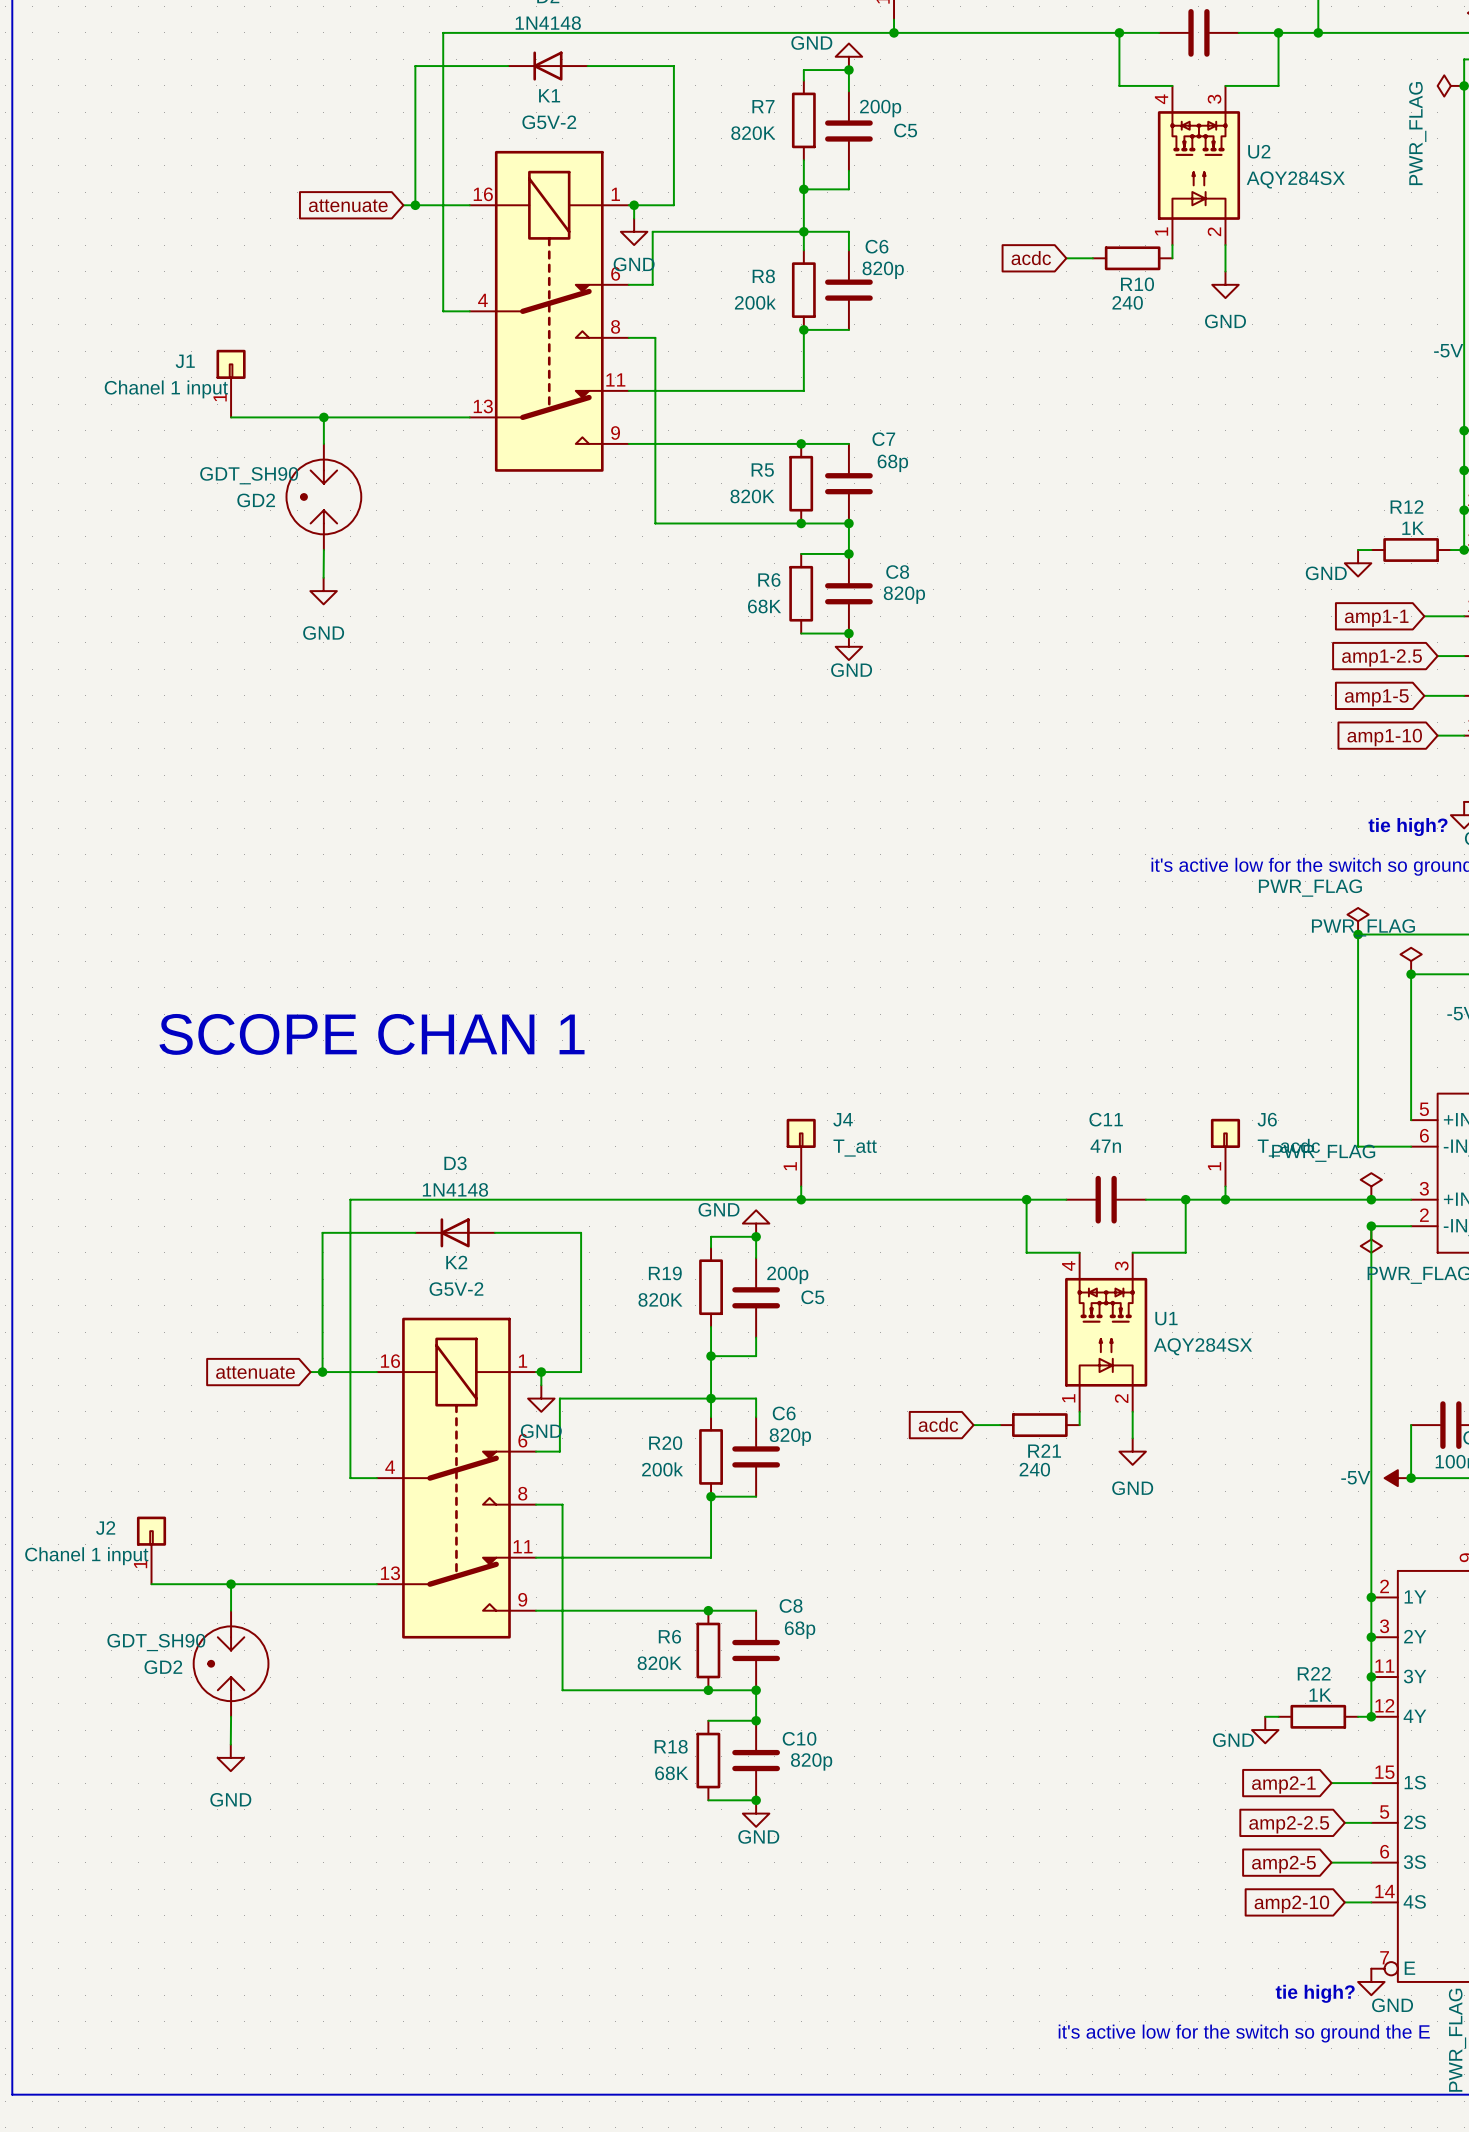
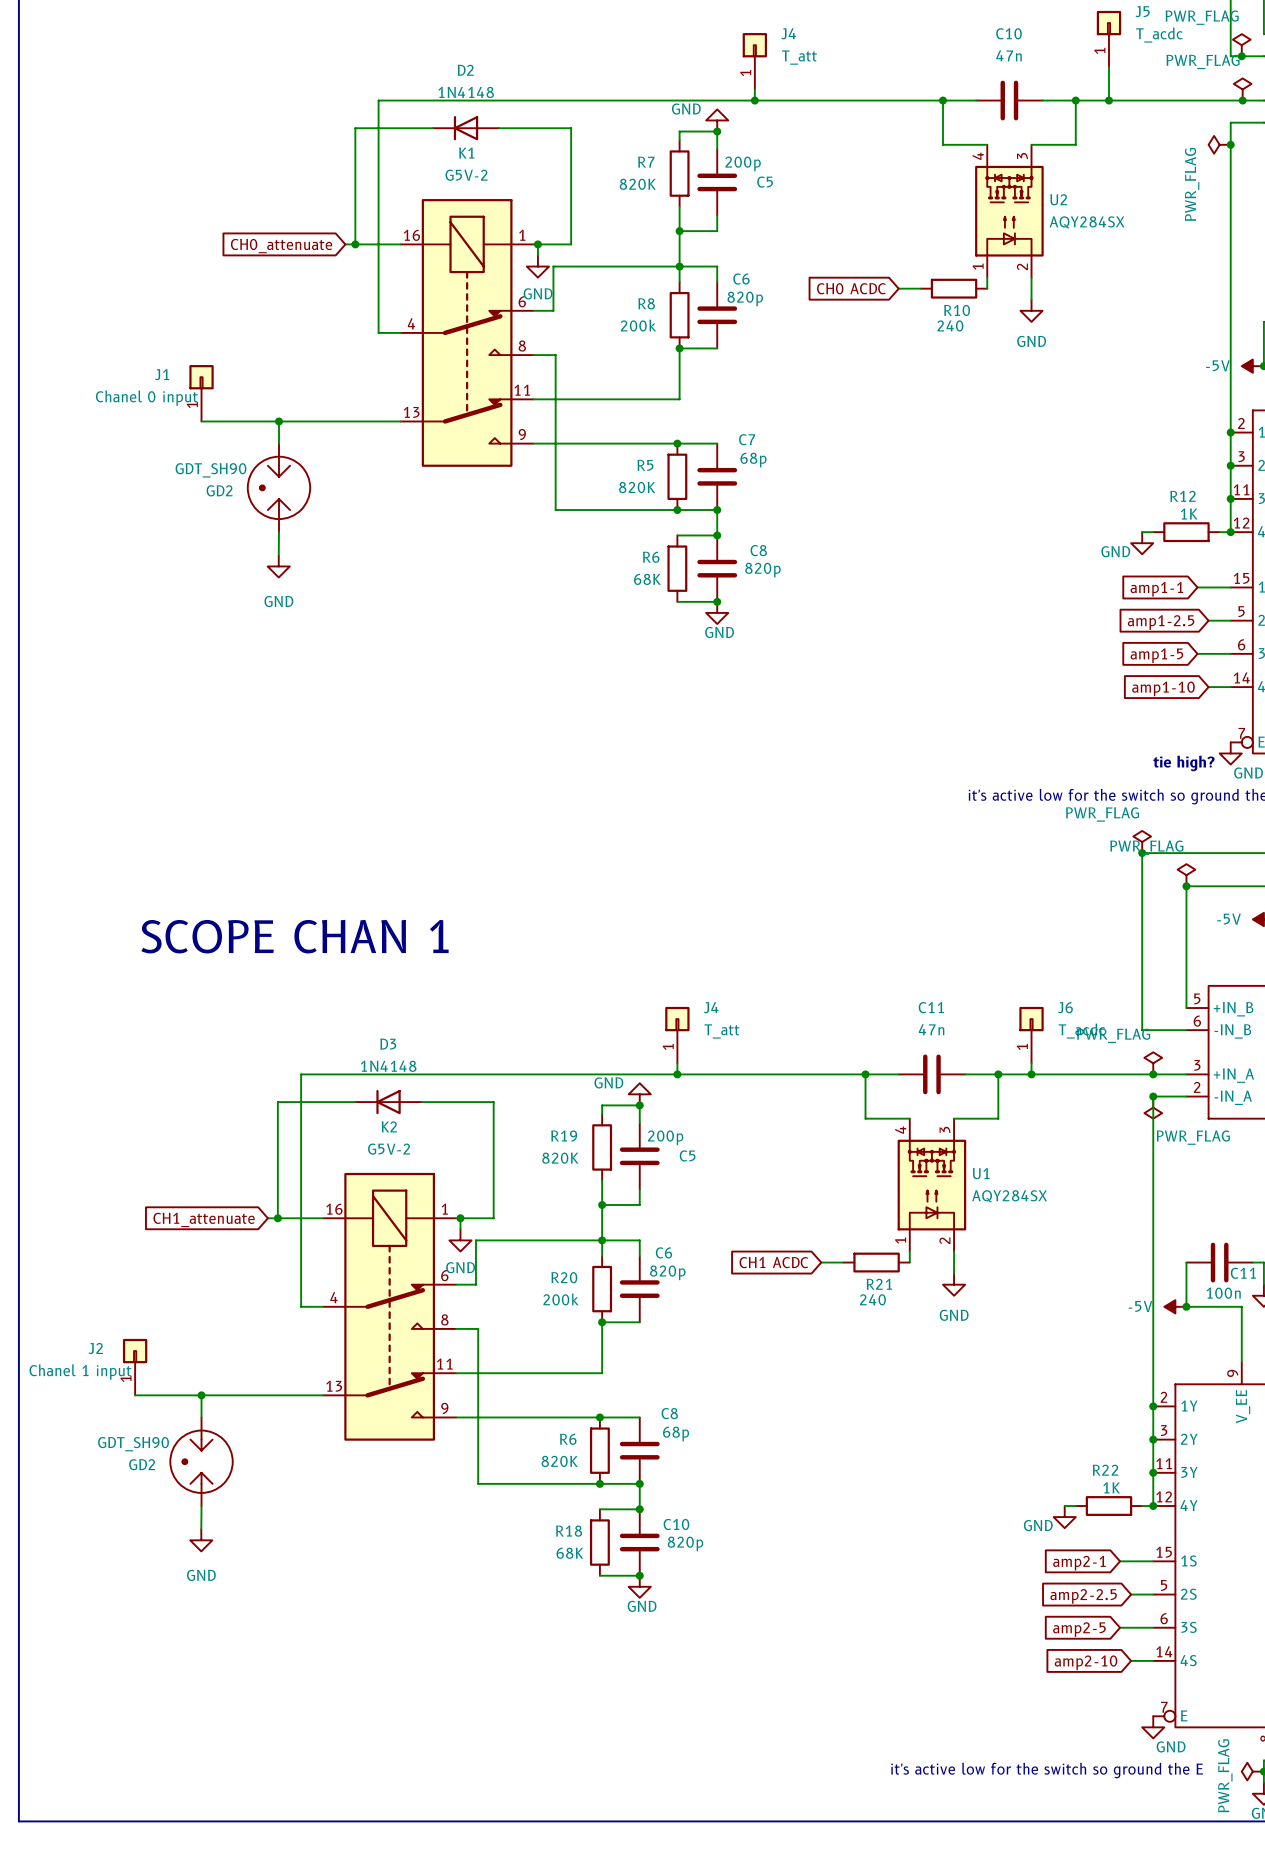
global label: attenuate (348, 205) -> CH0_attenuate (281, 246)
global label: acdc (1031, 258) -> CH0 ACDC (851, 288)
J1 value: Chanel 1 input (166, 389) -> Chanel 0 input (146, 398)
global label: attenuate (255, 1372) -> CH1_attenuate (204, 1219)
global label: acdc (938, 1424) -> CH1 ACDC (773, 1262)
text: tie high? (1315, 1993) -> none

